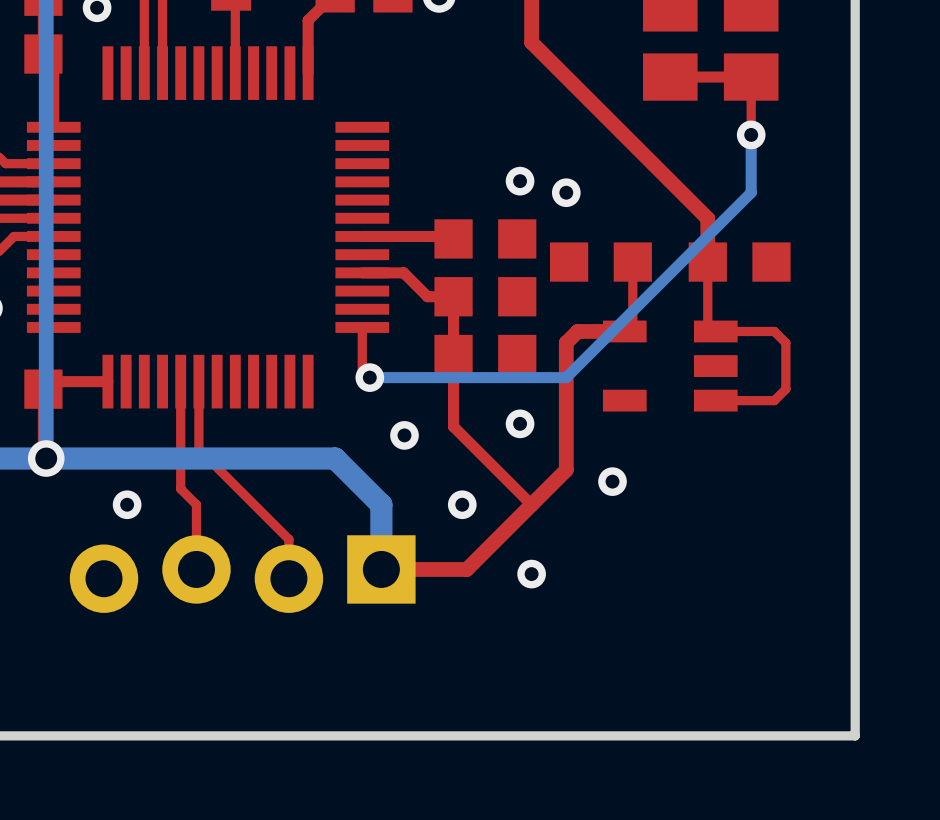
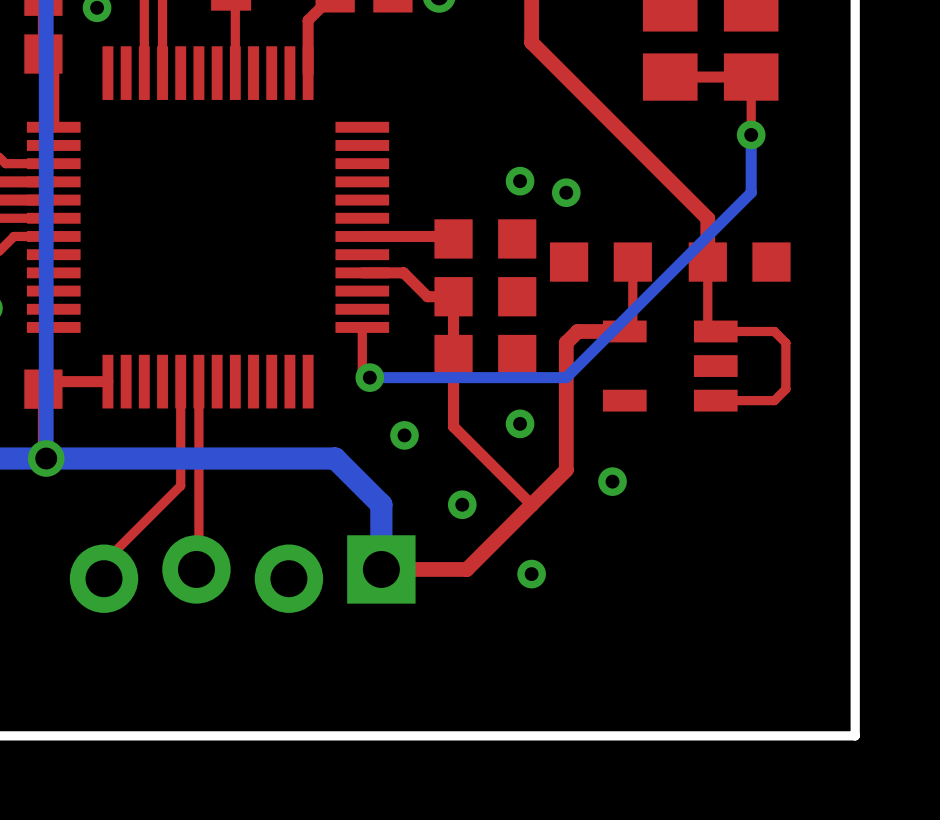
top track: (198, 449) (288, 539) (288, 578) -> none
top track: (180, 485) (180, 488) (196, 504) (196, 569) -> (198, 449) (198, 567) (196, 569)
top track: none -> (180, 485) (104, 562) (104, 578)
via: (127, 504) -> none

